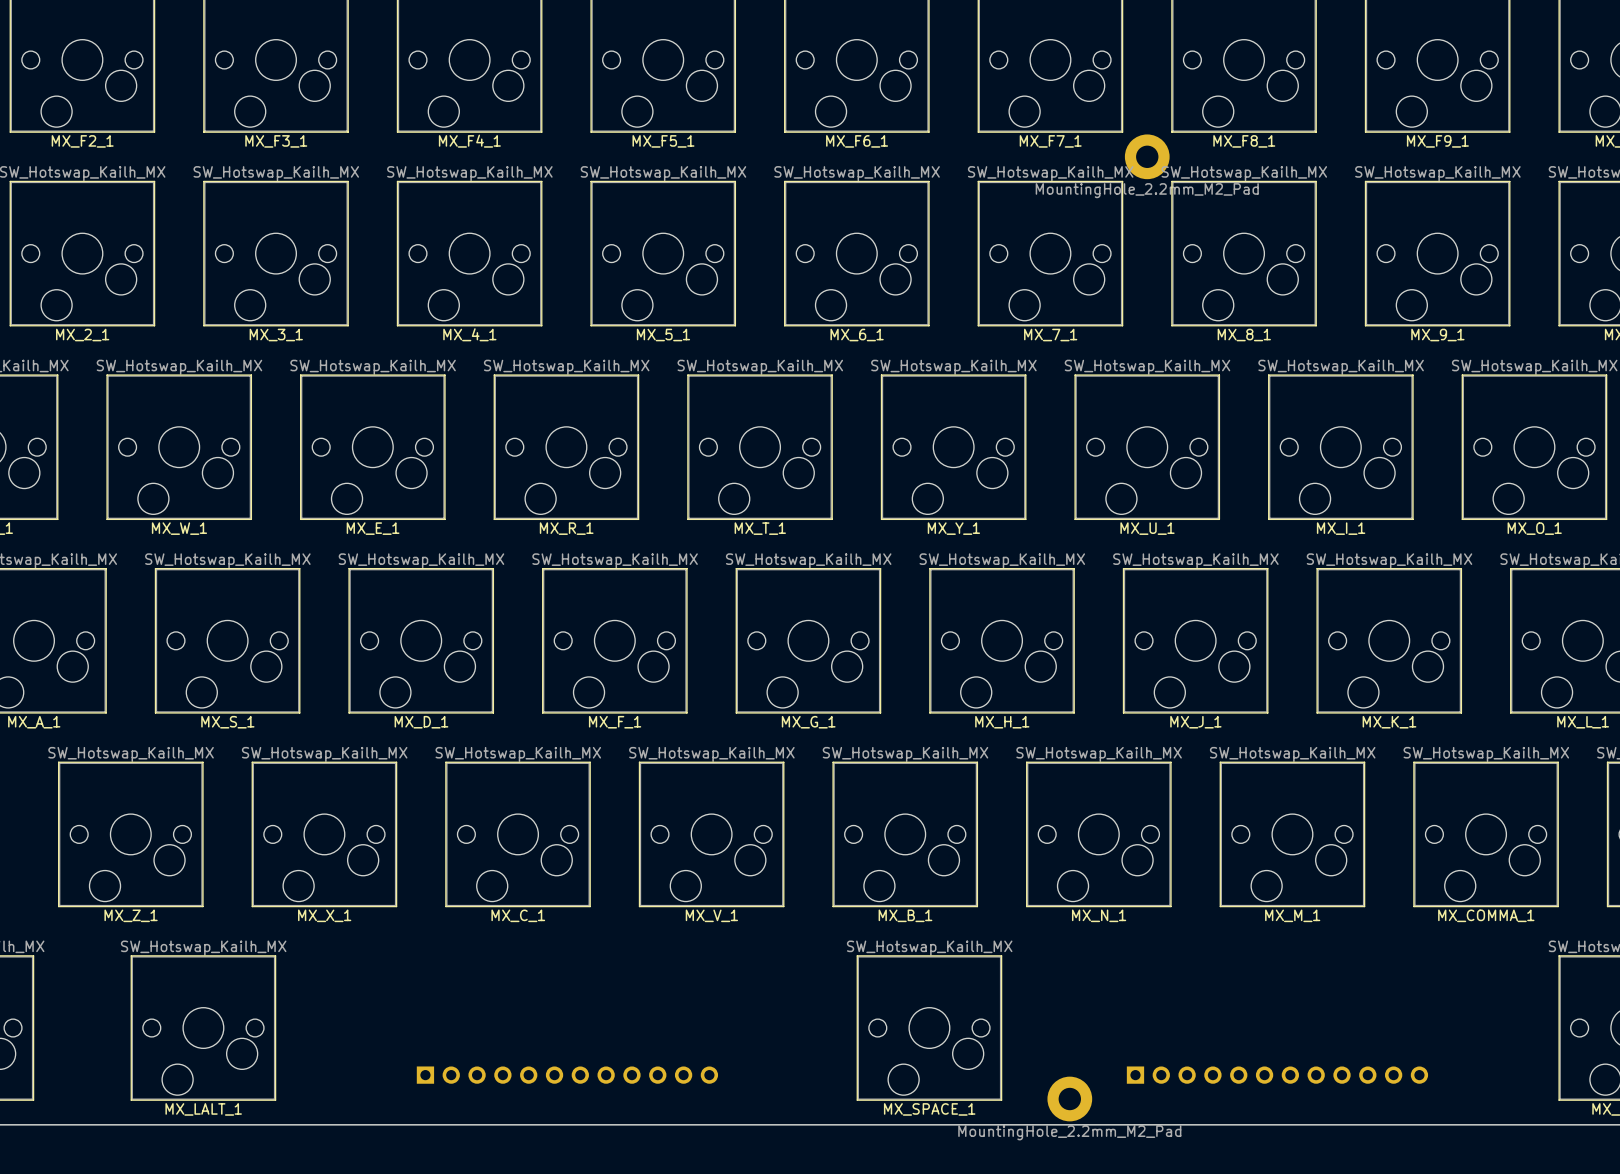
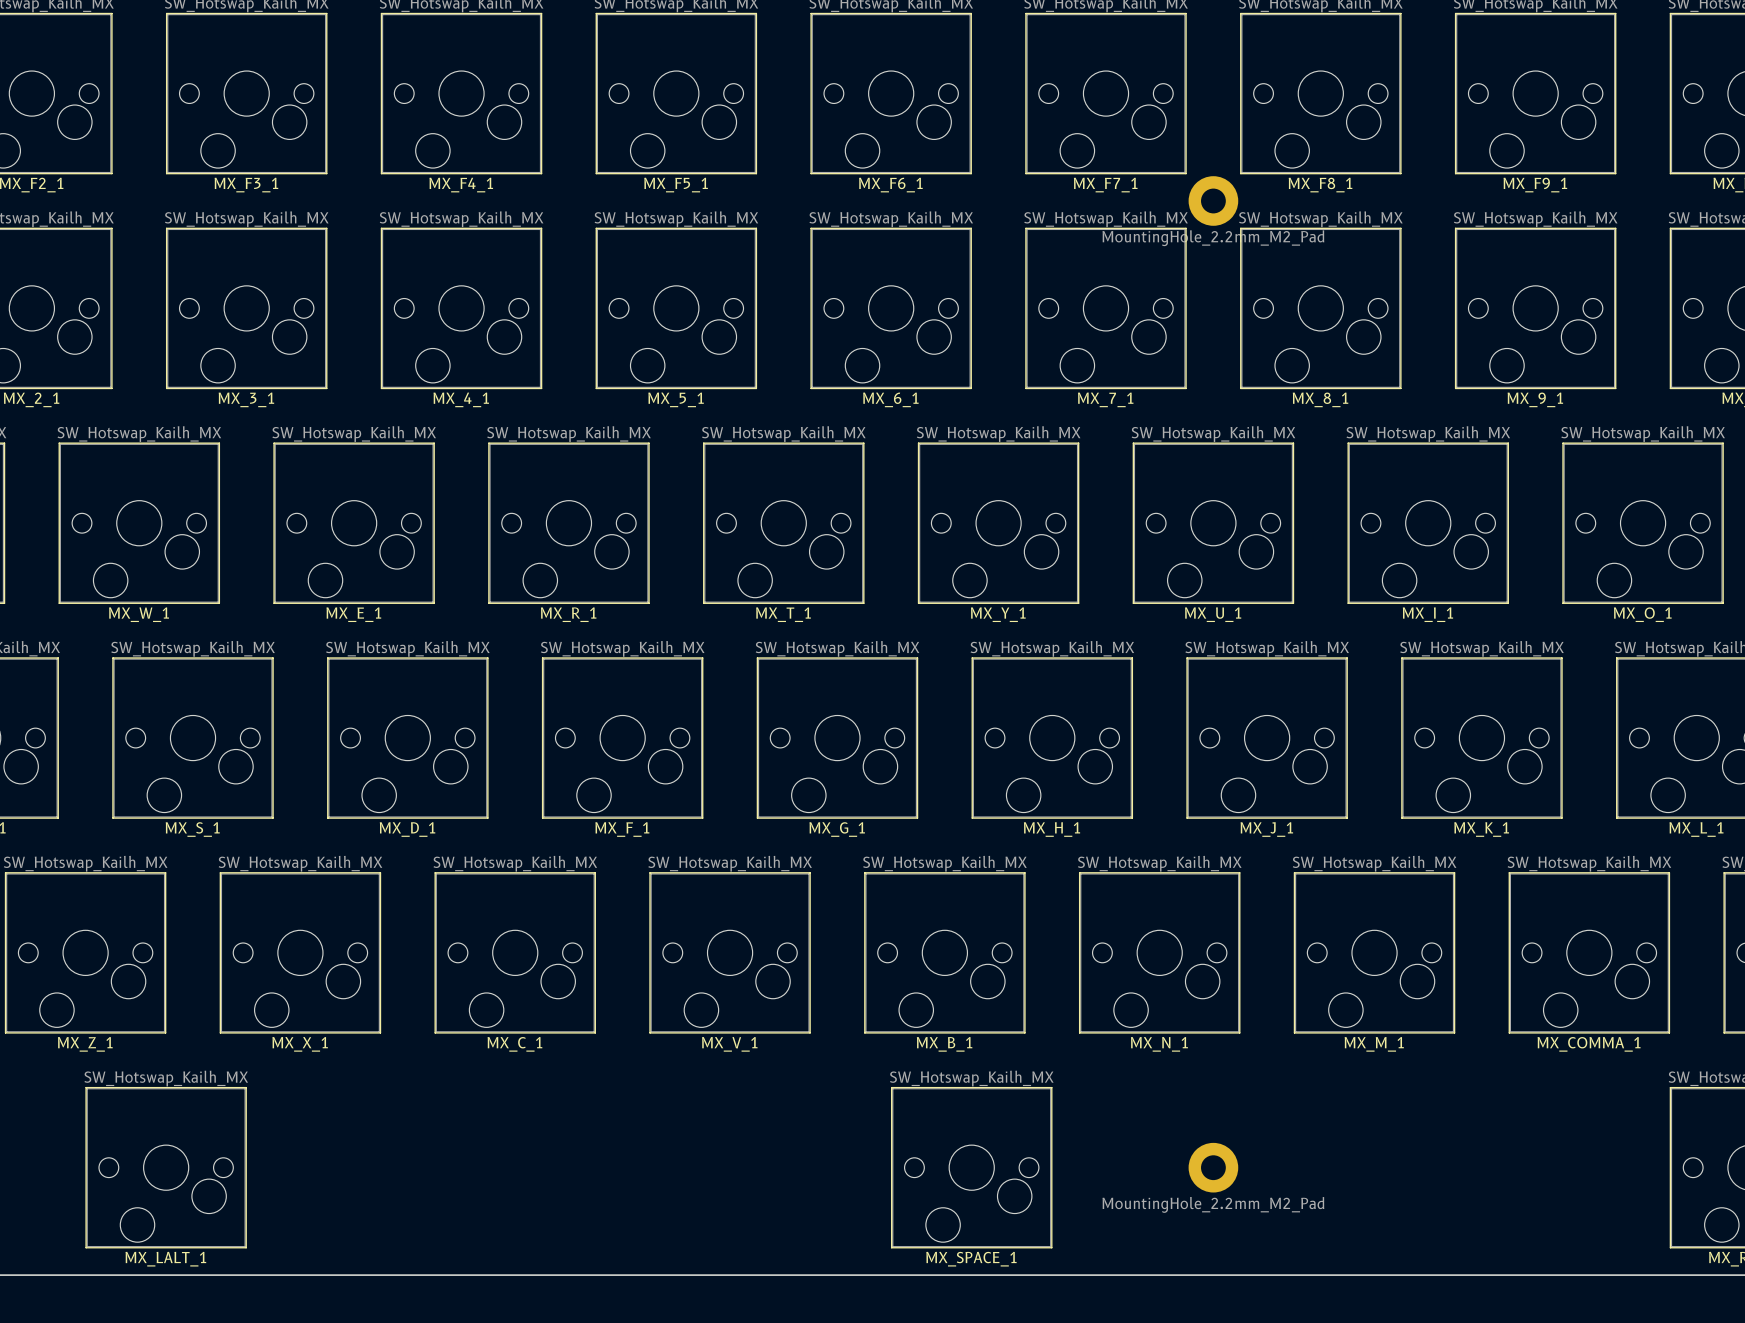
part: (567, 1075) -> none
part: (1277, 1075) -> none
part position: (1069, 1099) -> (1213, 1167)

